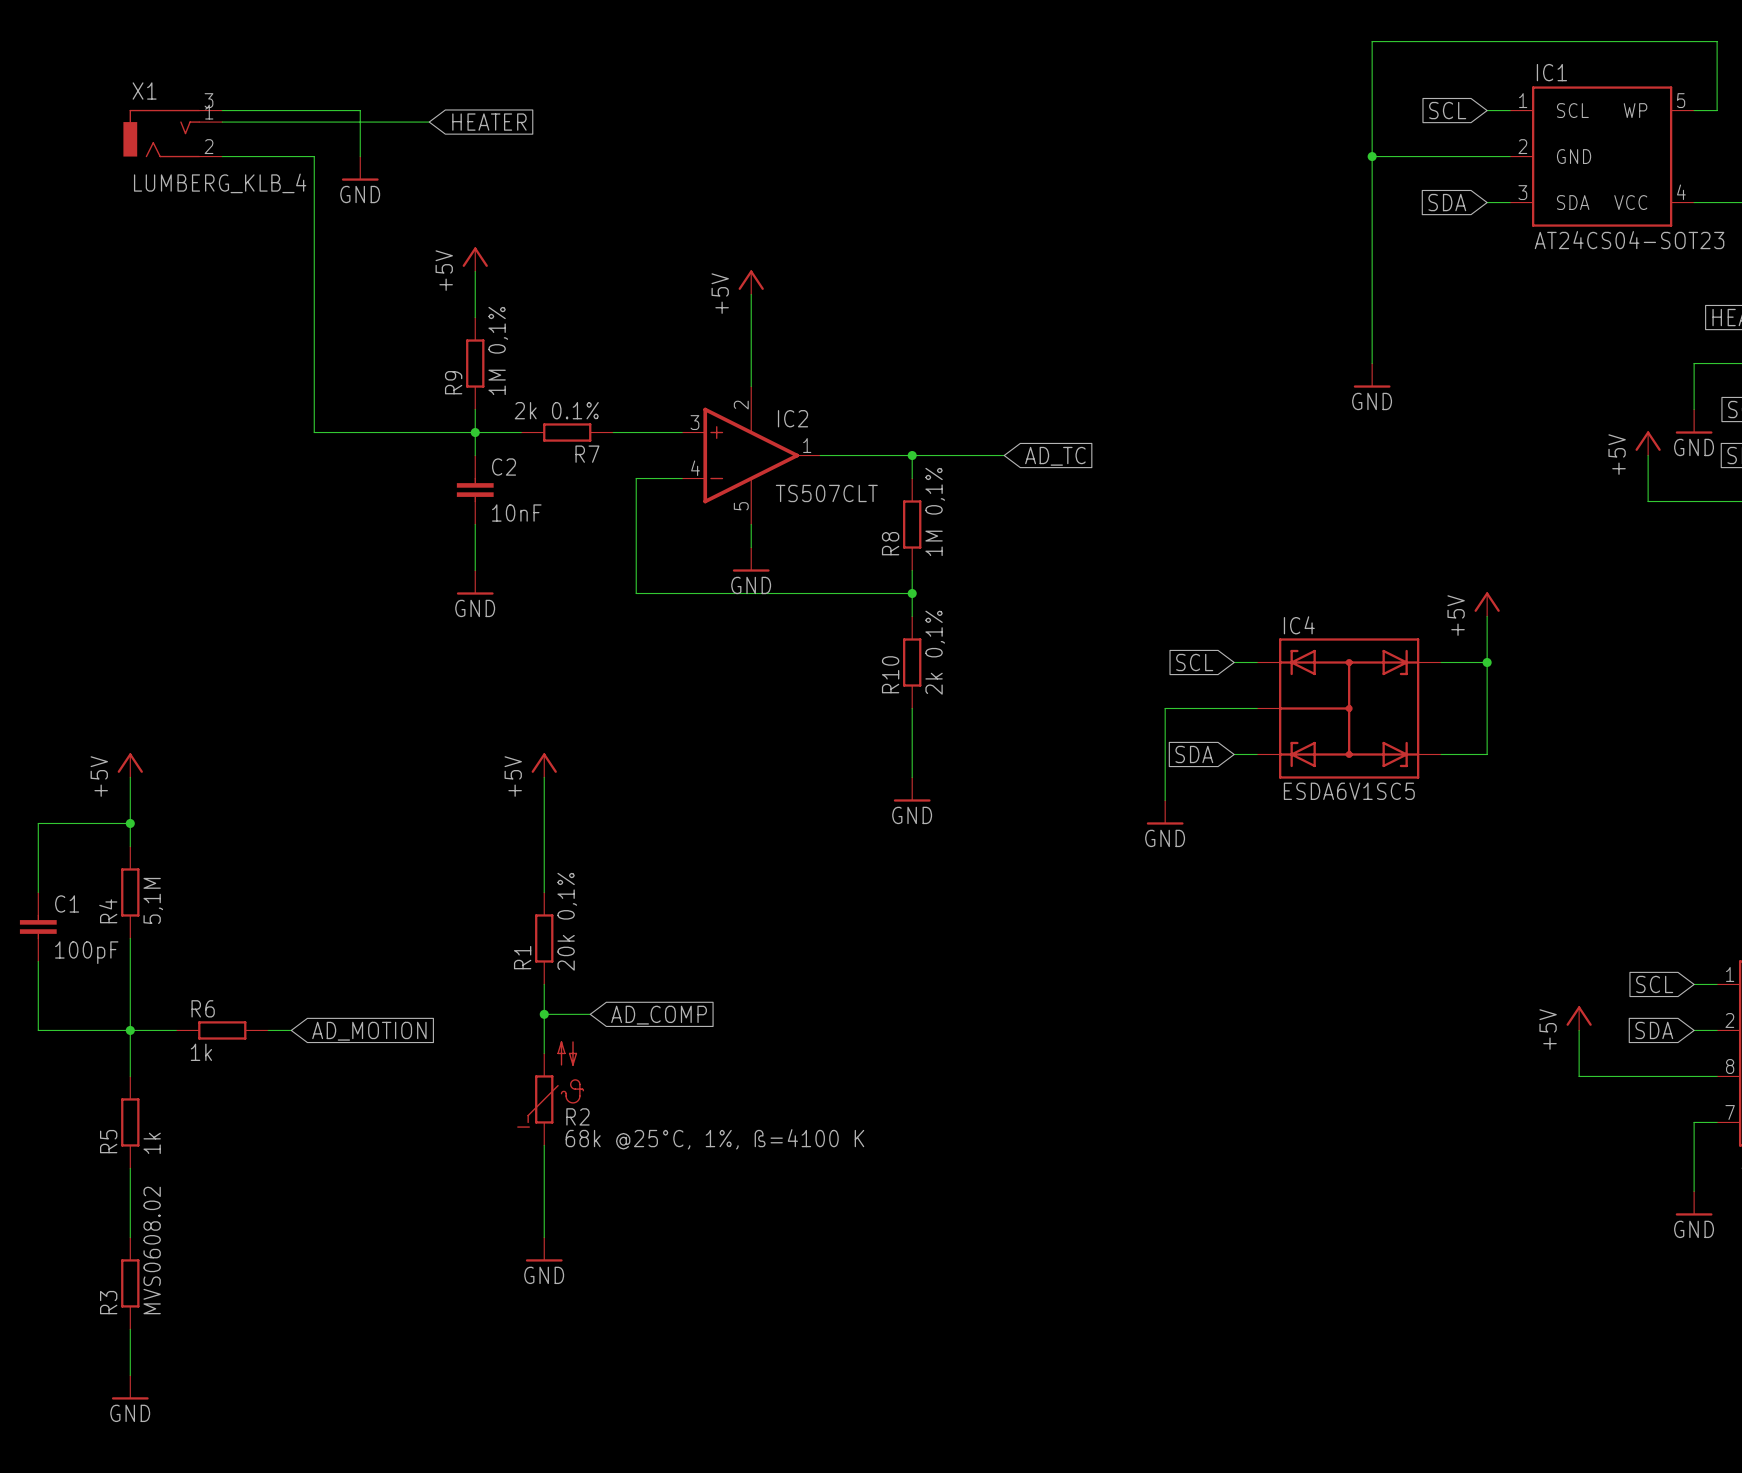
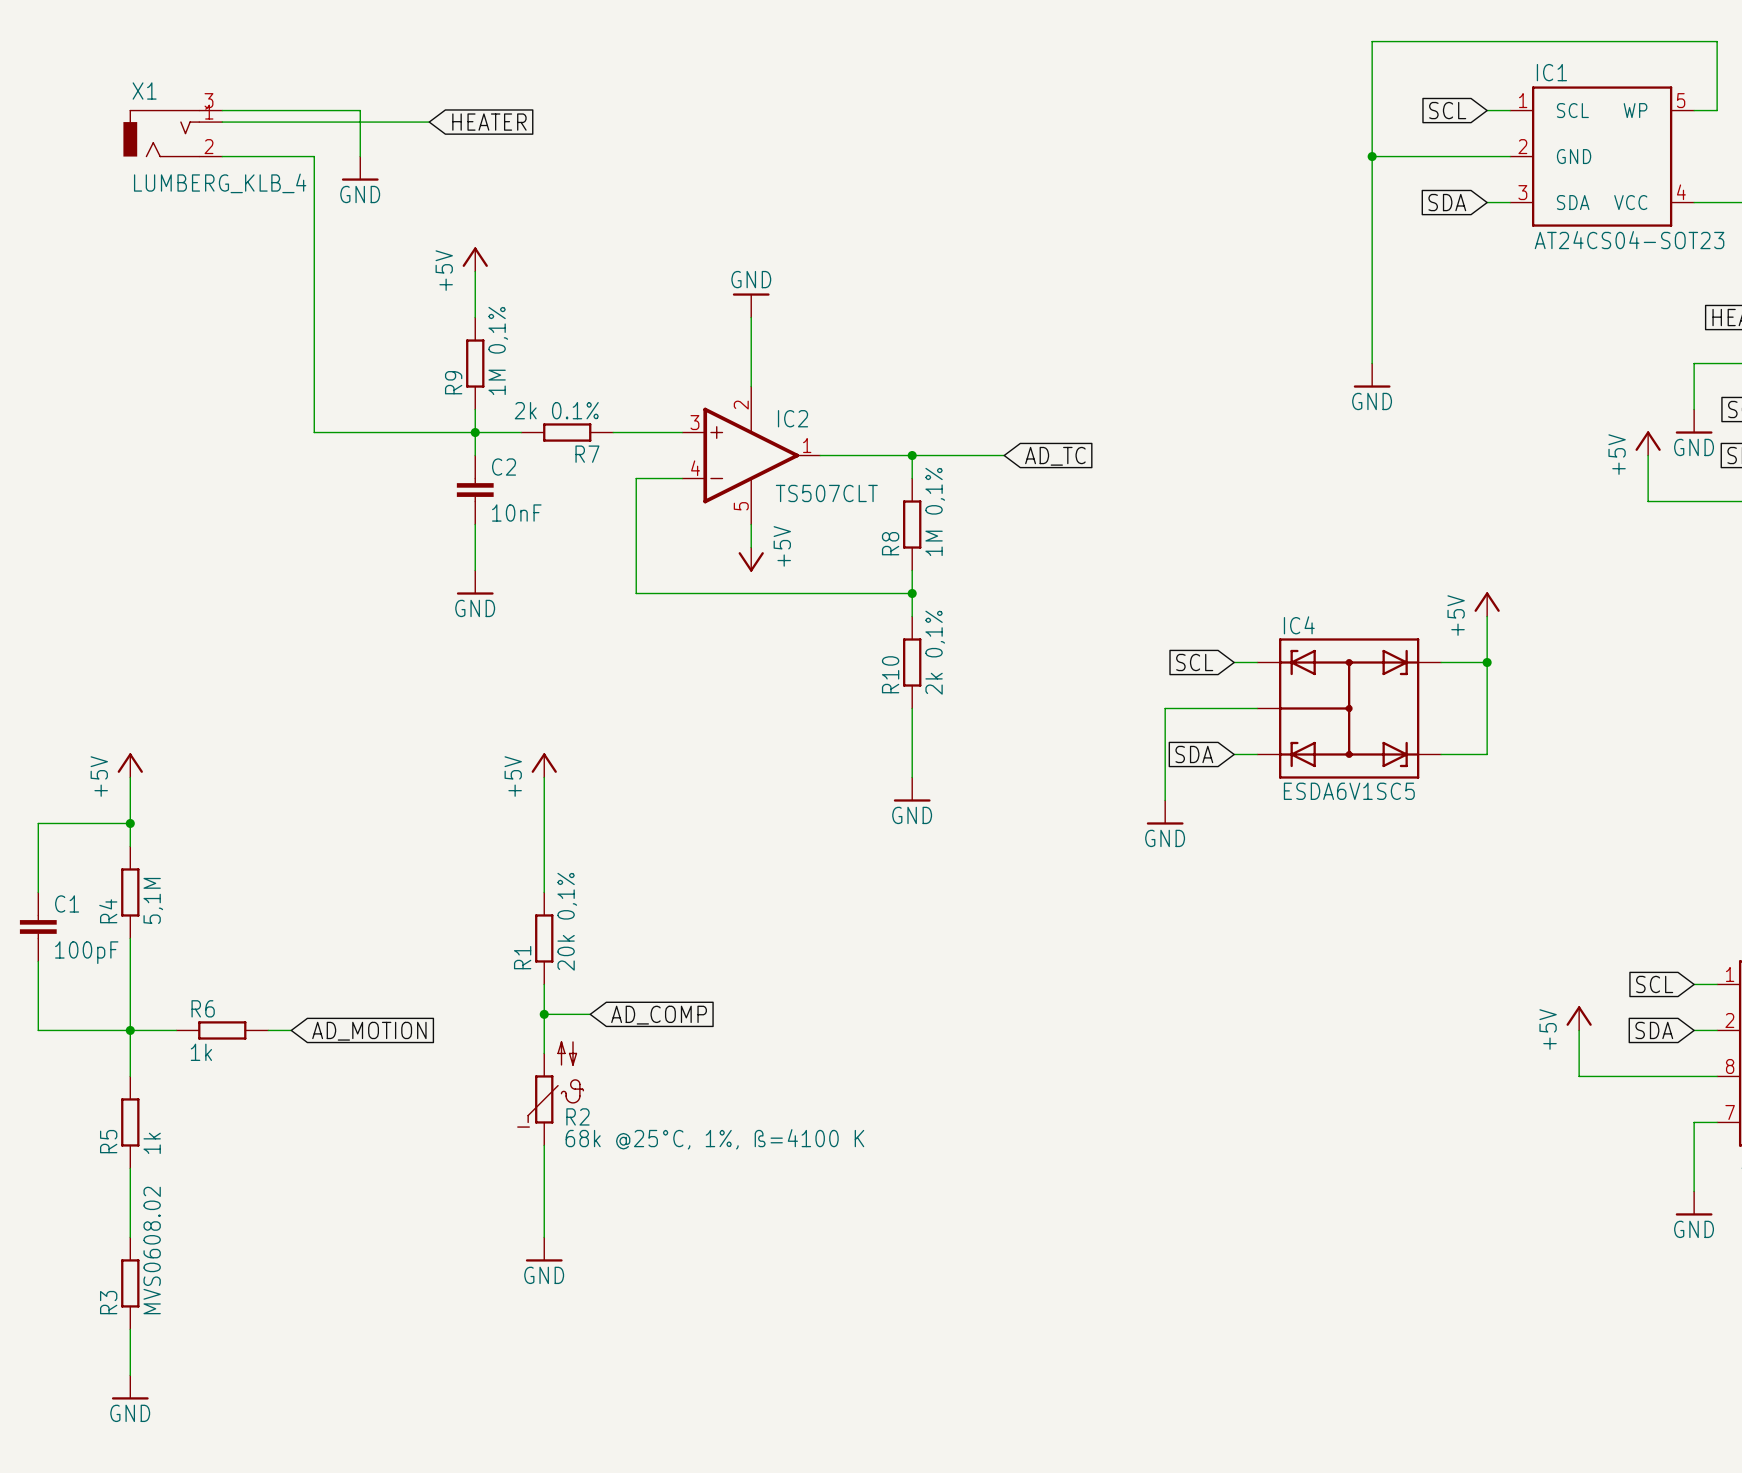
power symbol: +5V (751, 282) -> none
power symbol: none -> GND (751, 305)
power symbol: GND (751, 559) -> +5V (751, 559)

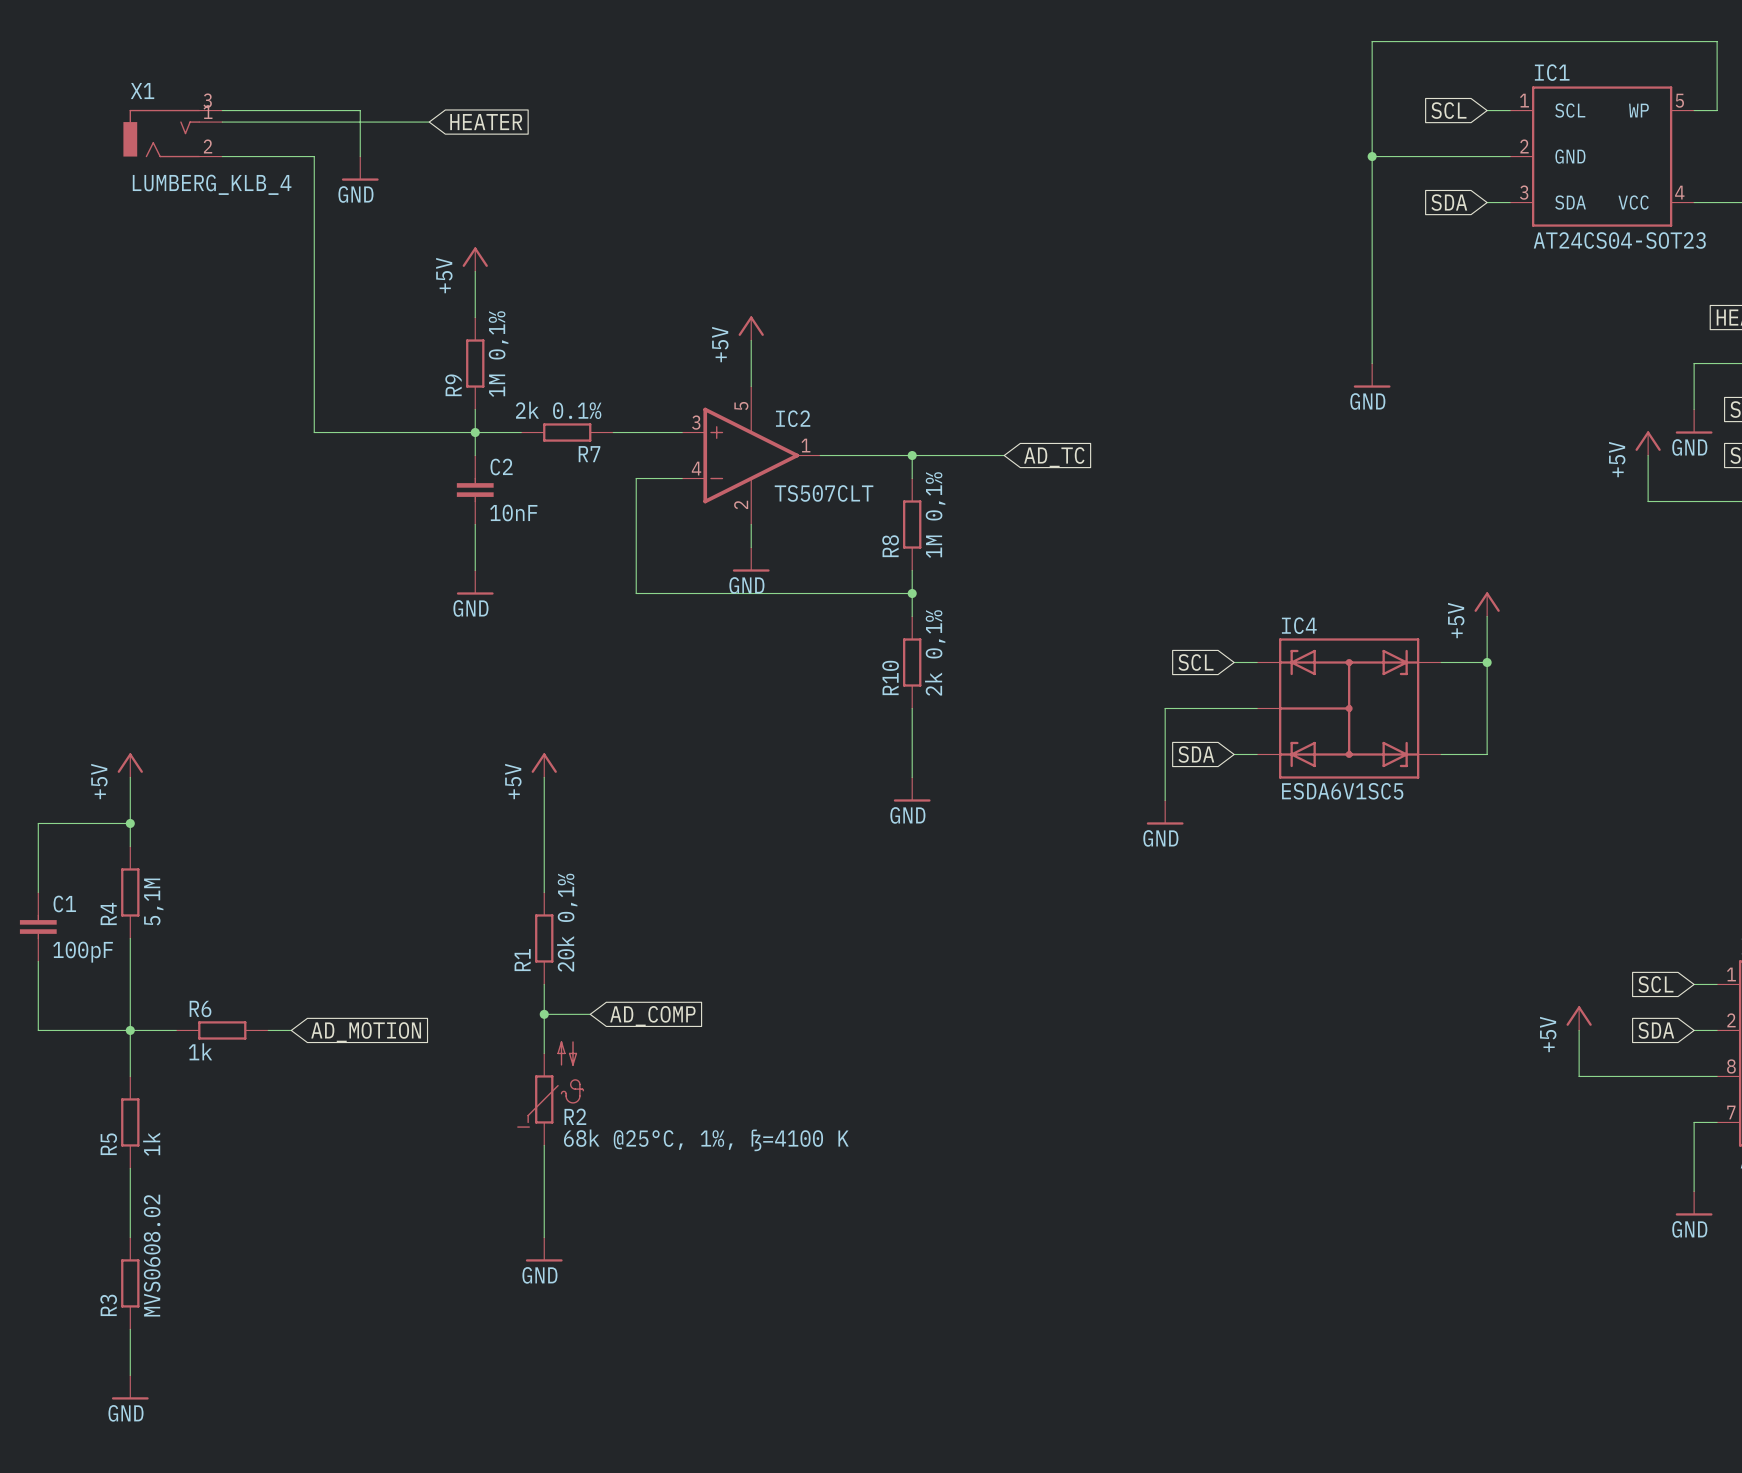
power symbol: GND (751, 305) -> none
power symbol: none -> +5V (751, 328)
IC2 pin number: 2 (741, 405) -> 5 (741, 406)
IC2 pin number: 5 (741, 506) -> 2 (741, 504)
power symbol: +5V (751, 559) -> GND (751, 559)

